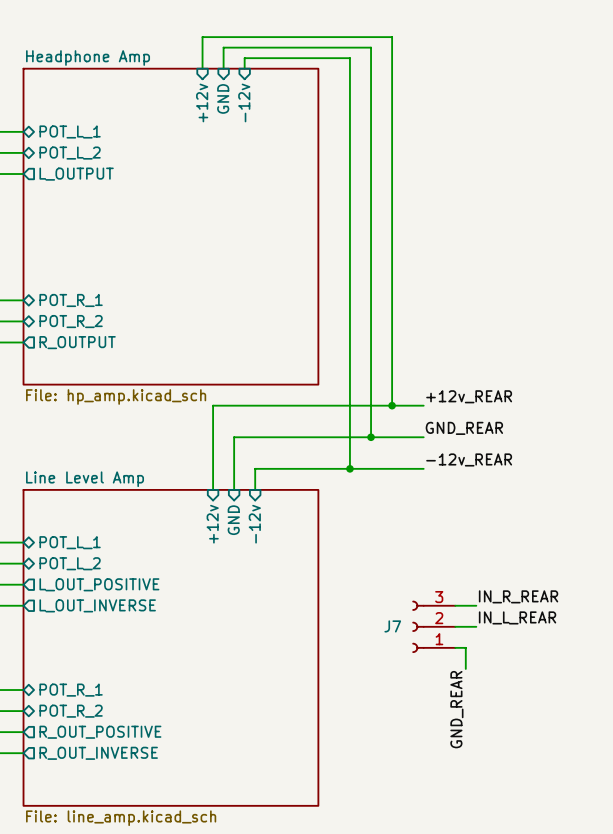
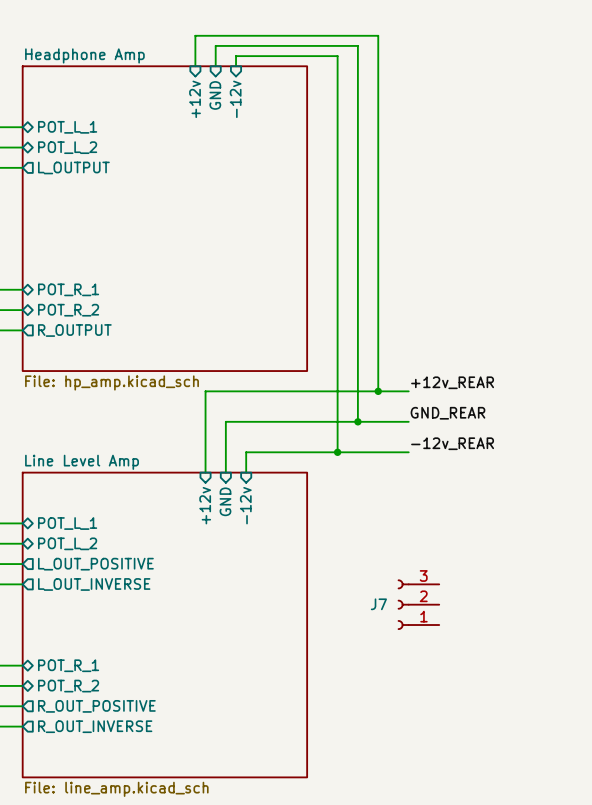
label: IN_R_REAR (518, 596) -> none
wire: (455, 605) (476, 605) -> none
label: IN_L_REAR (517, 617) -> none
wire: (455, 626) (476, 626) -> none
wire: (455, 647) (465, 647) (465, 668) -> none
label: GND_REAR (456, 709) -> none

